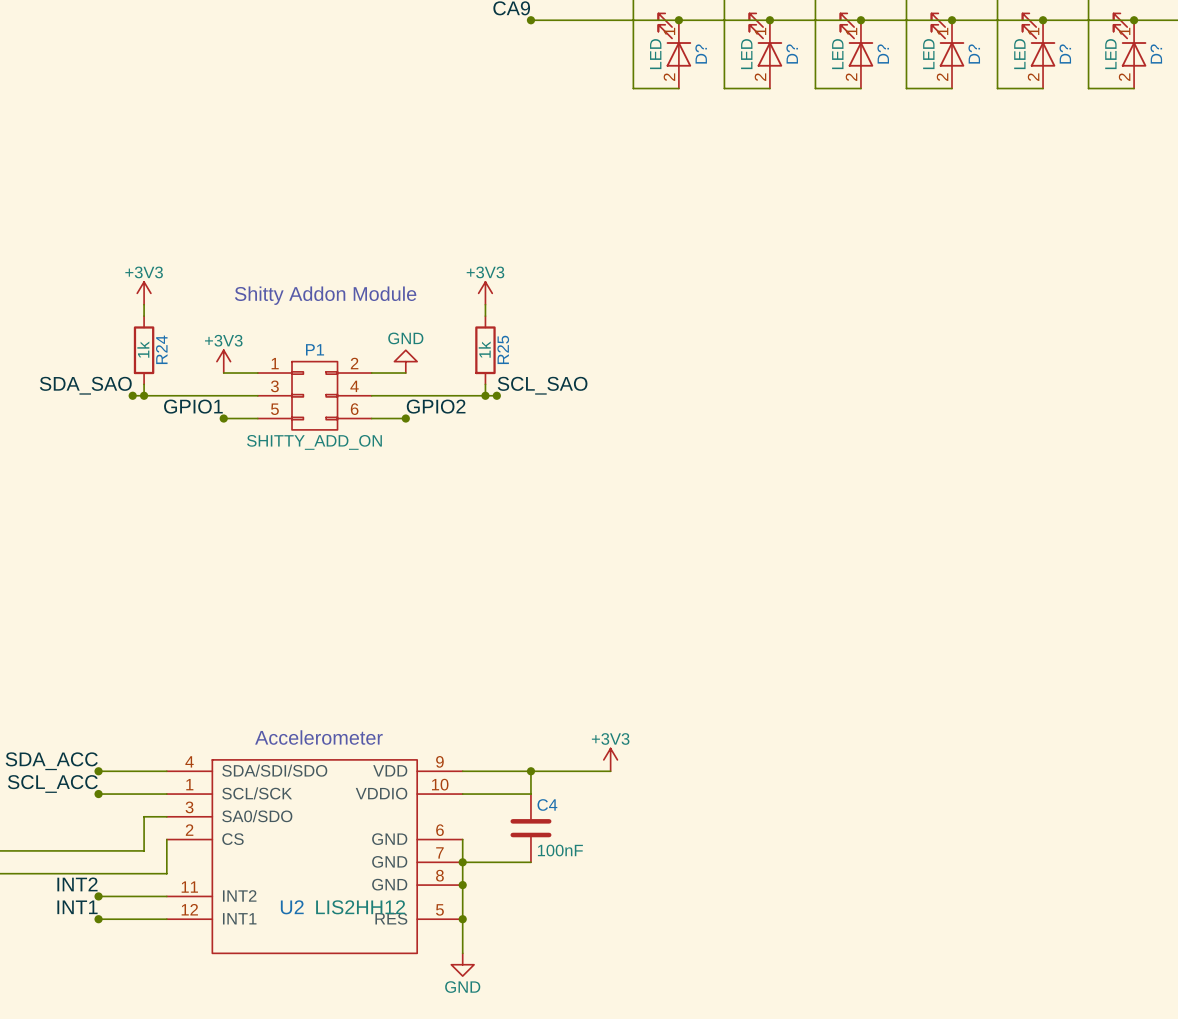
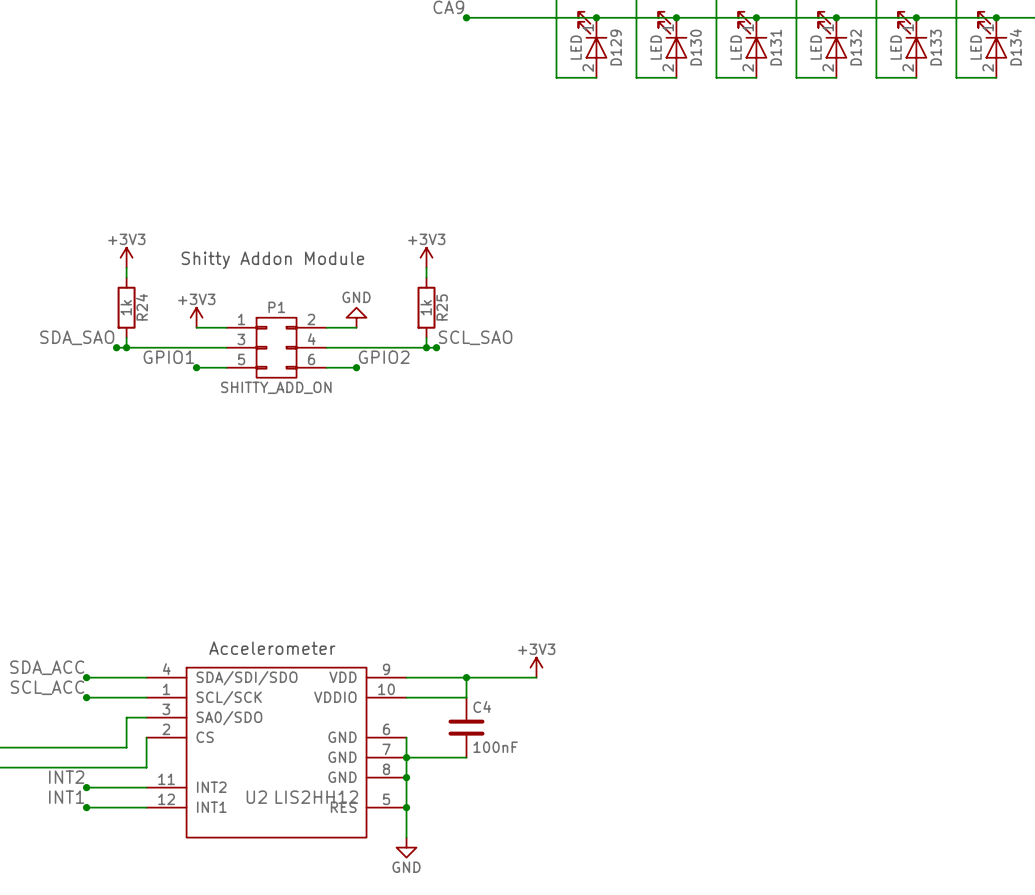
D? name: D? (701, 54) -> D129 (616, 47)
D? name: D? (792, 54) -> D130 (696, 47)
D? name: D? (883, 54) -> D131 (776, 47)
D? name: D? (974, 54) -> D132 (856, 47)
D? name: D? (1065, 54) -> D133 (936, 47)
D? name: D? (1156, 54) -> D134 (1015, 47)

